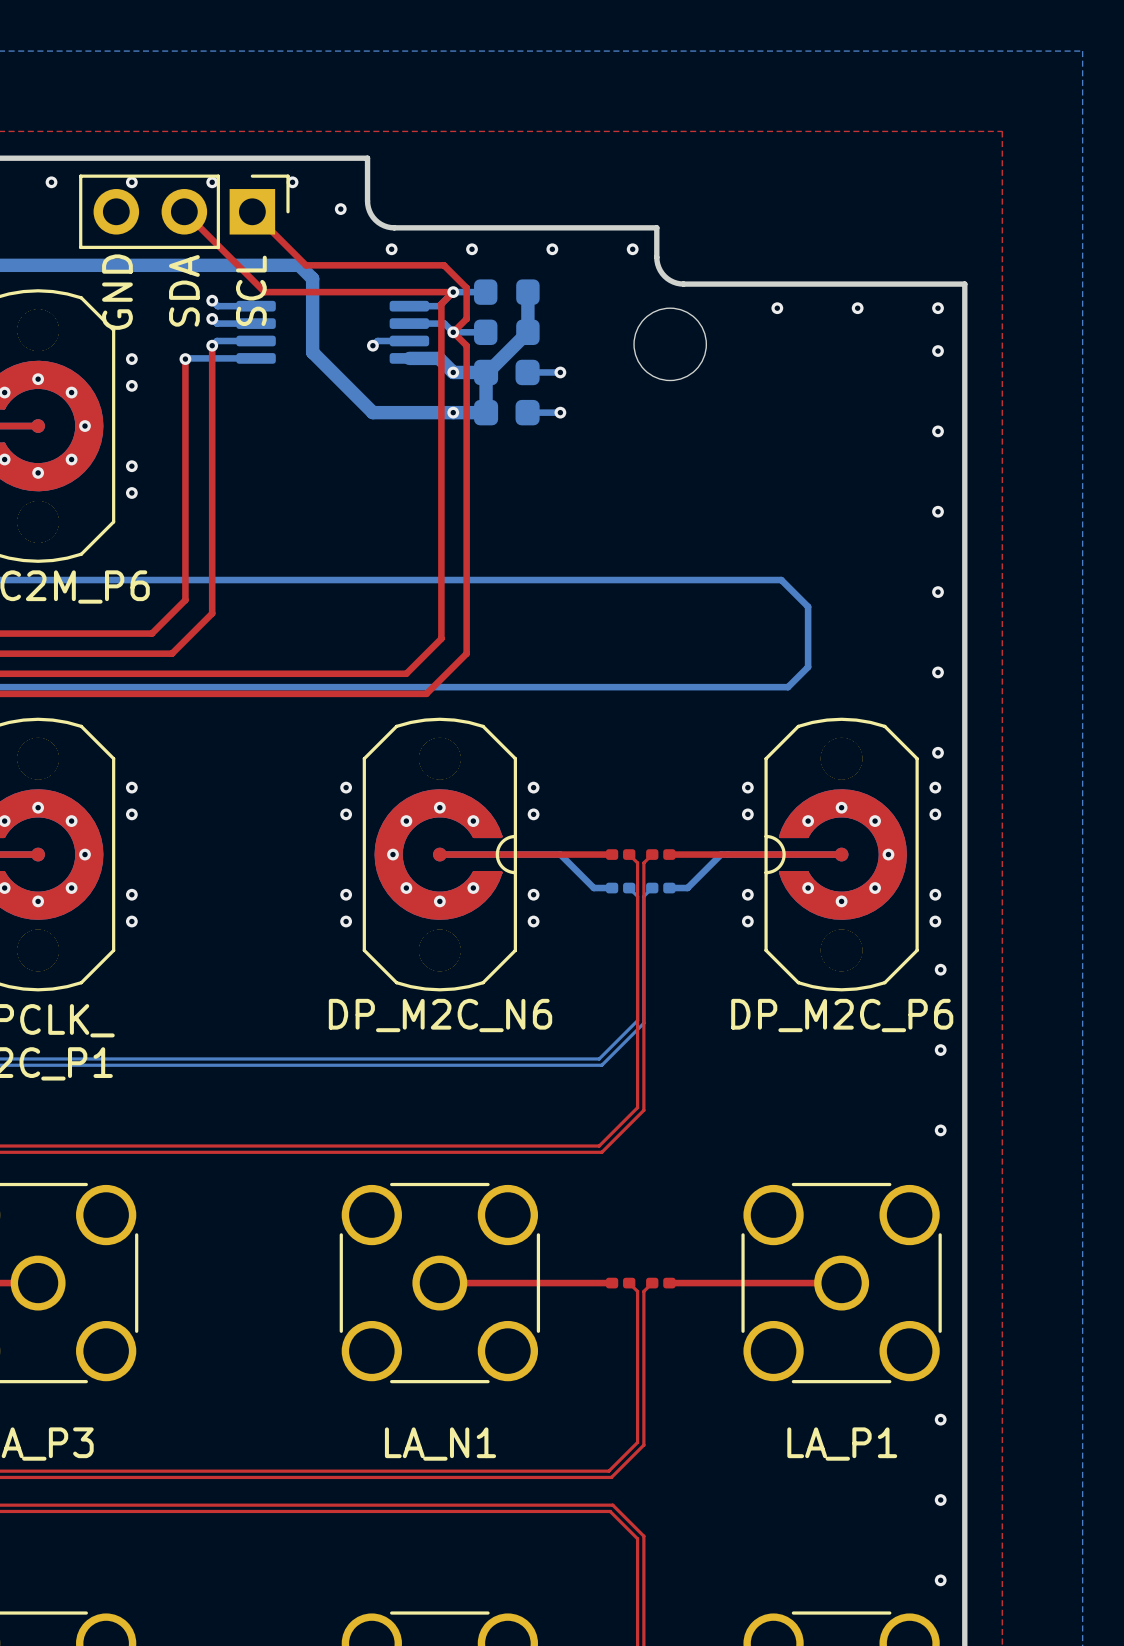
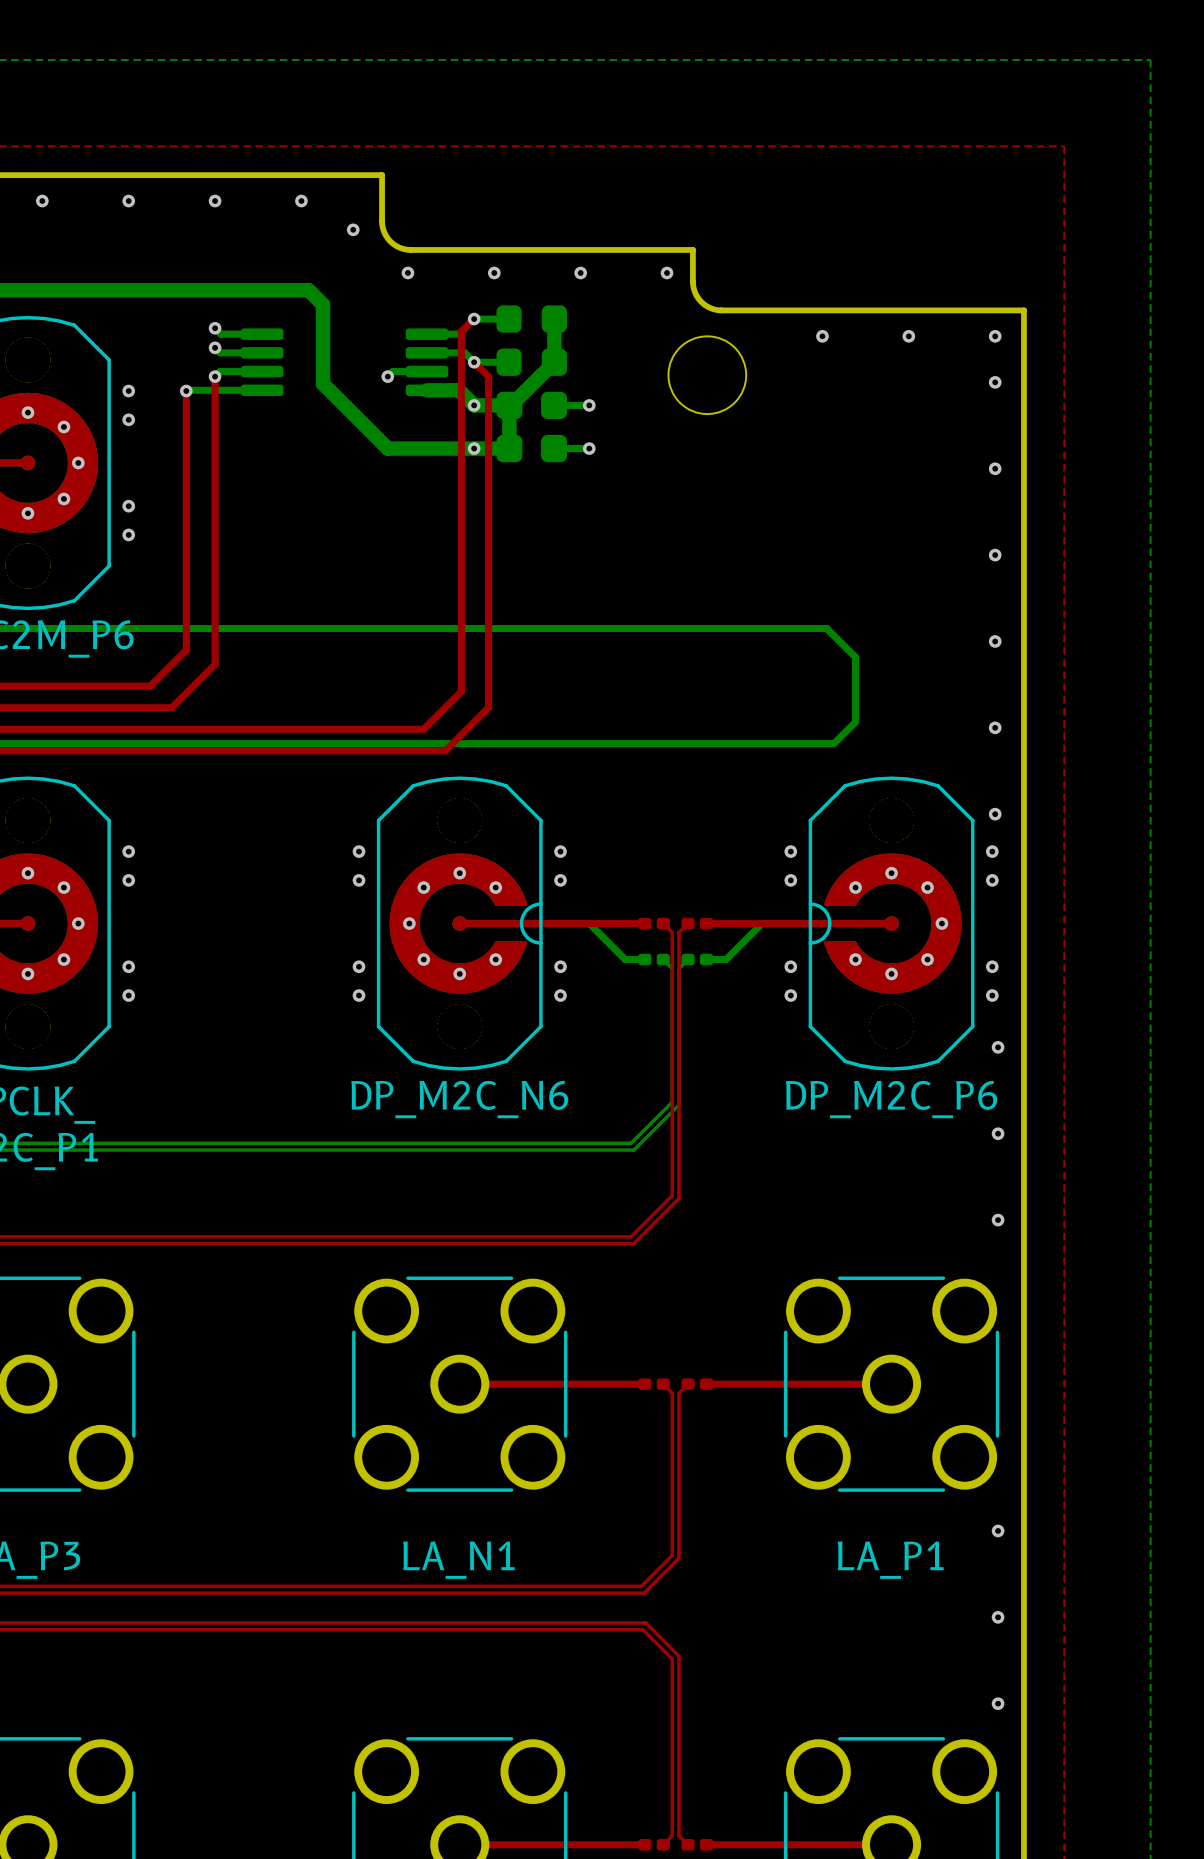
top track: (184, 211) (264, 292) (453, 292) -> none
part: (184, 211) -> none
top track: (252, 211) (305, 265) (444, 265) (466, 287) (466, 318) (453, 332) -> none
text: SDA (184, 290) -> none
text: SCL (251, 290) -> none
text: GND (117, 292) -> none

